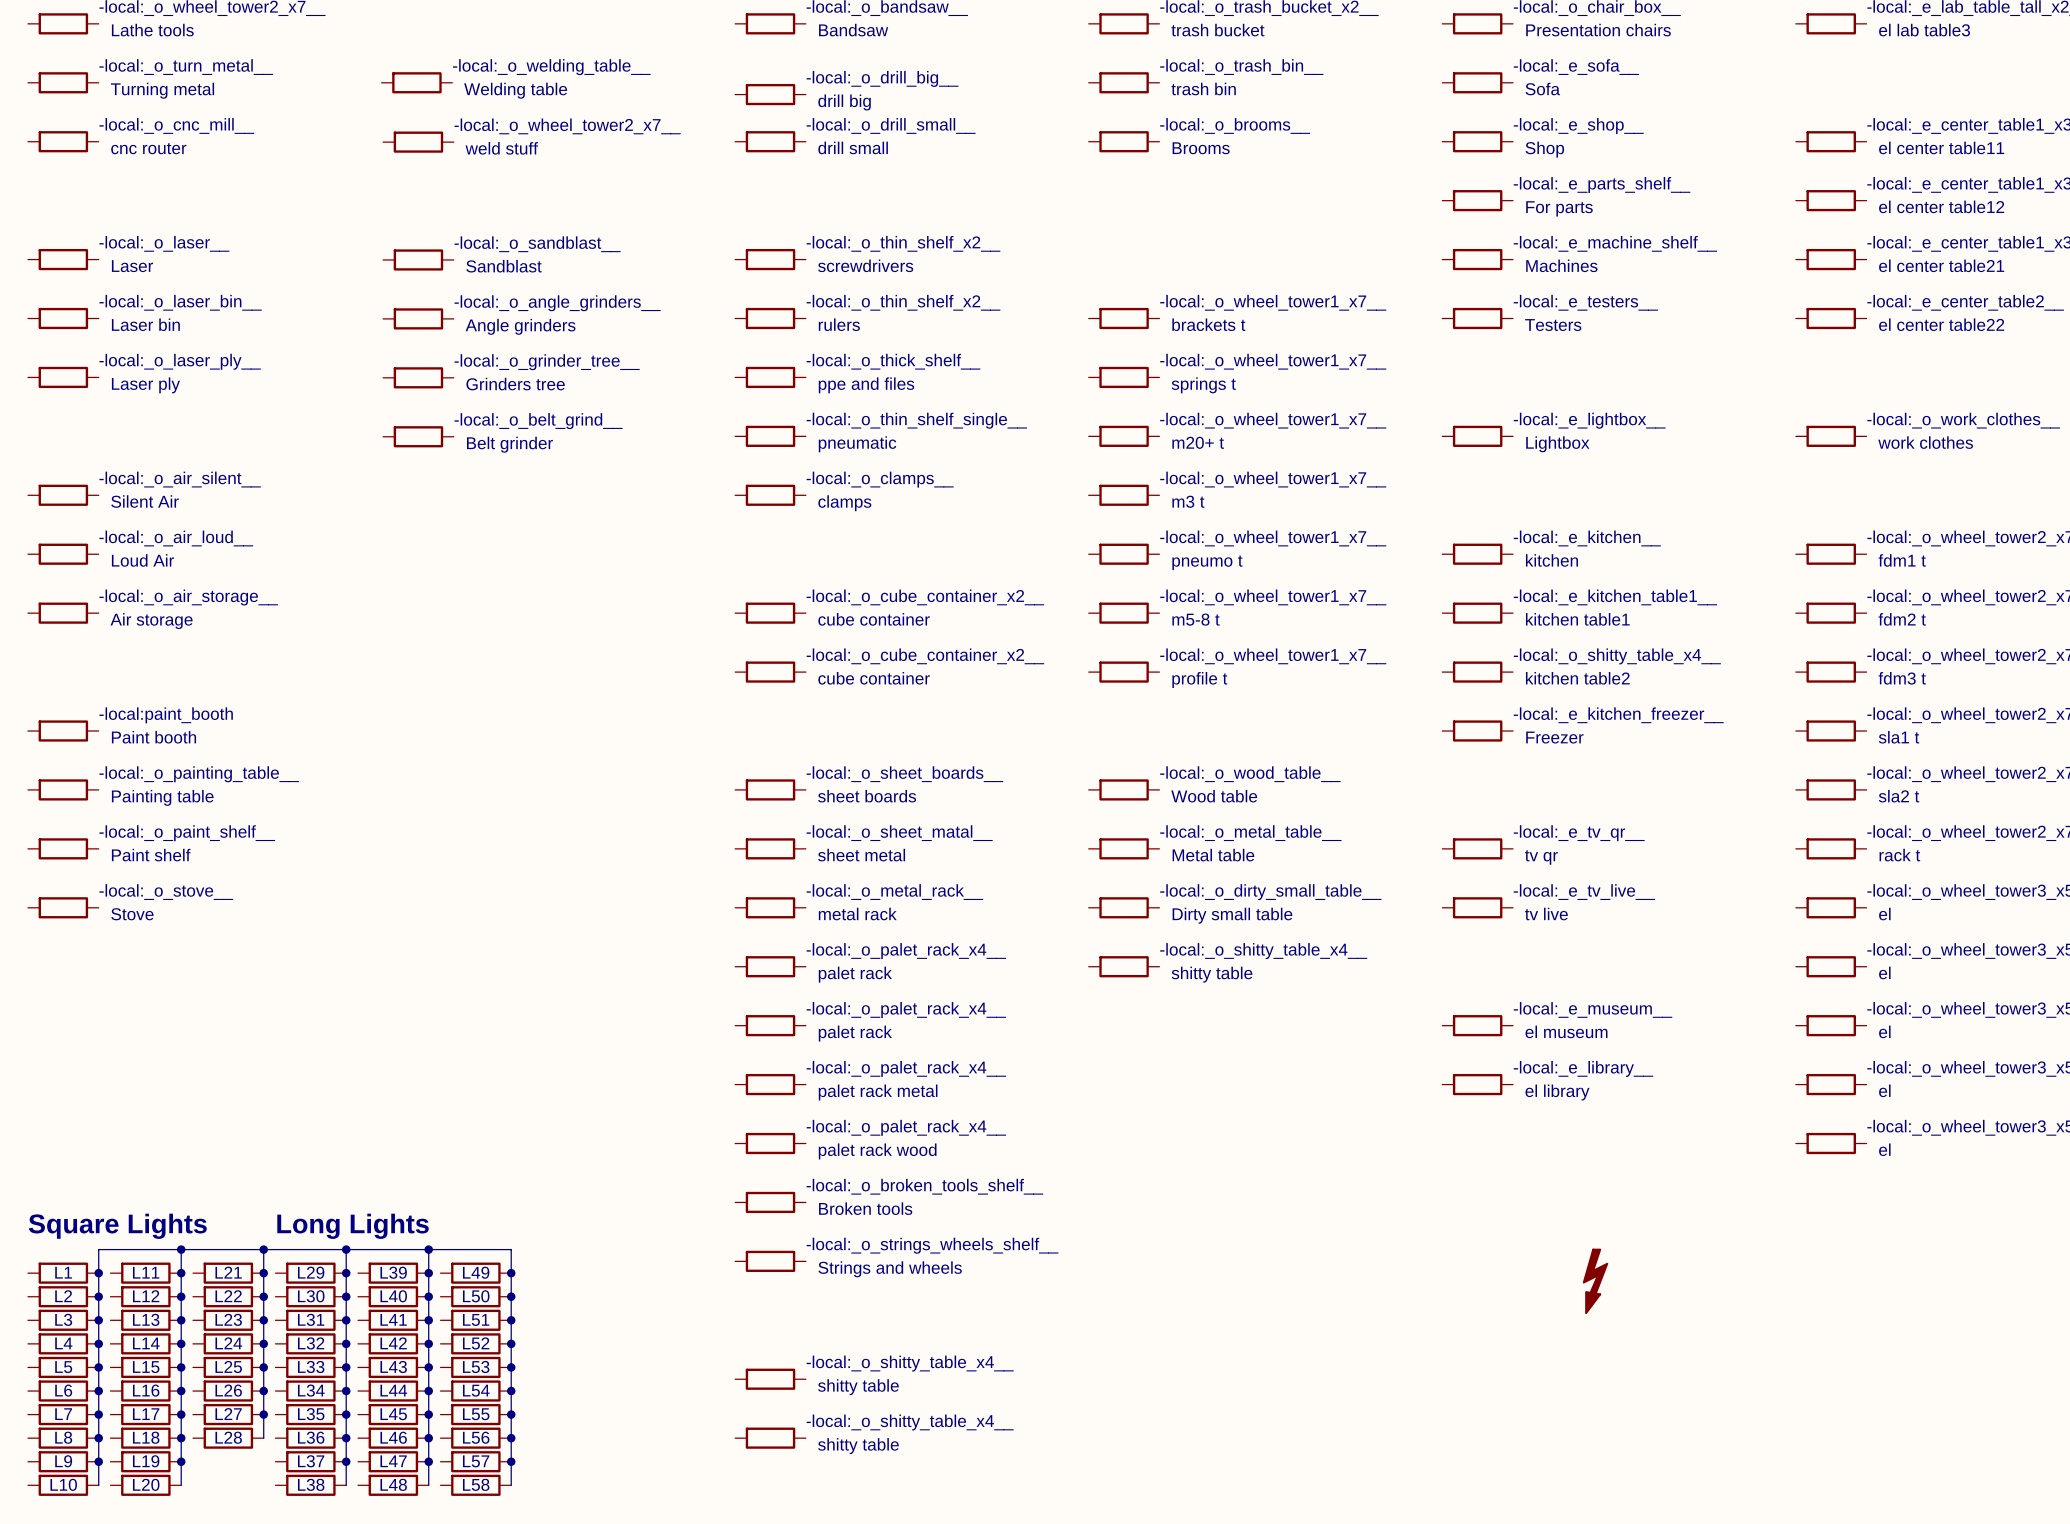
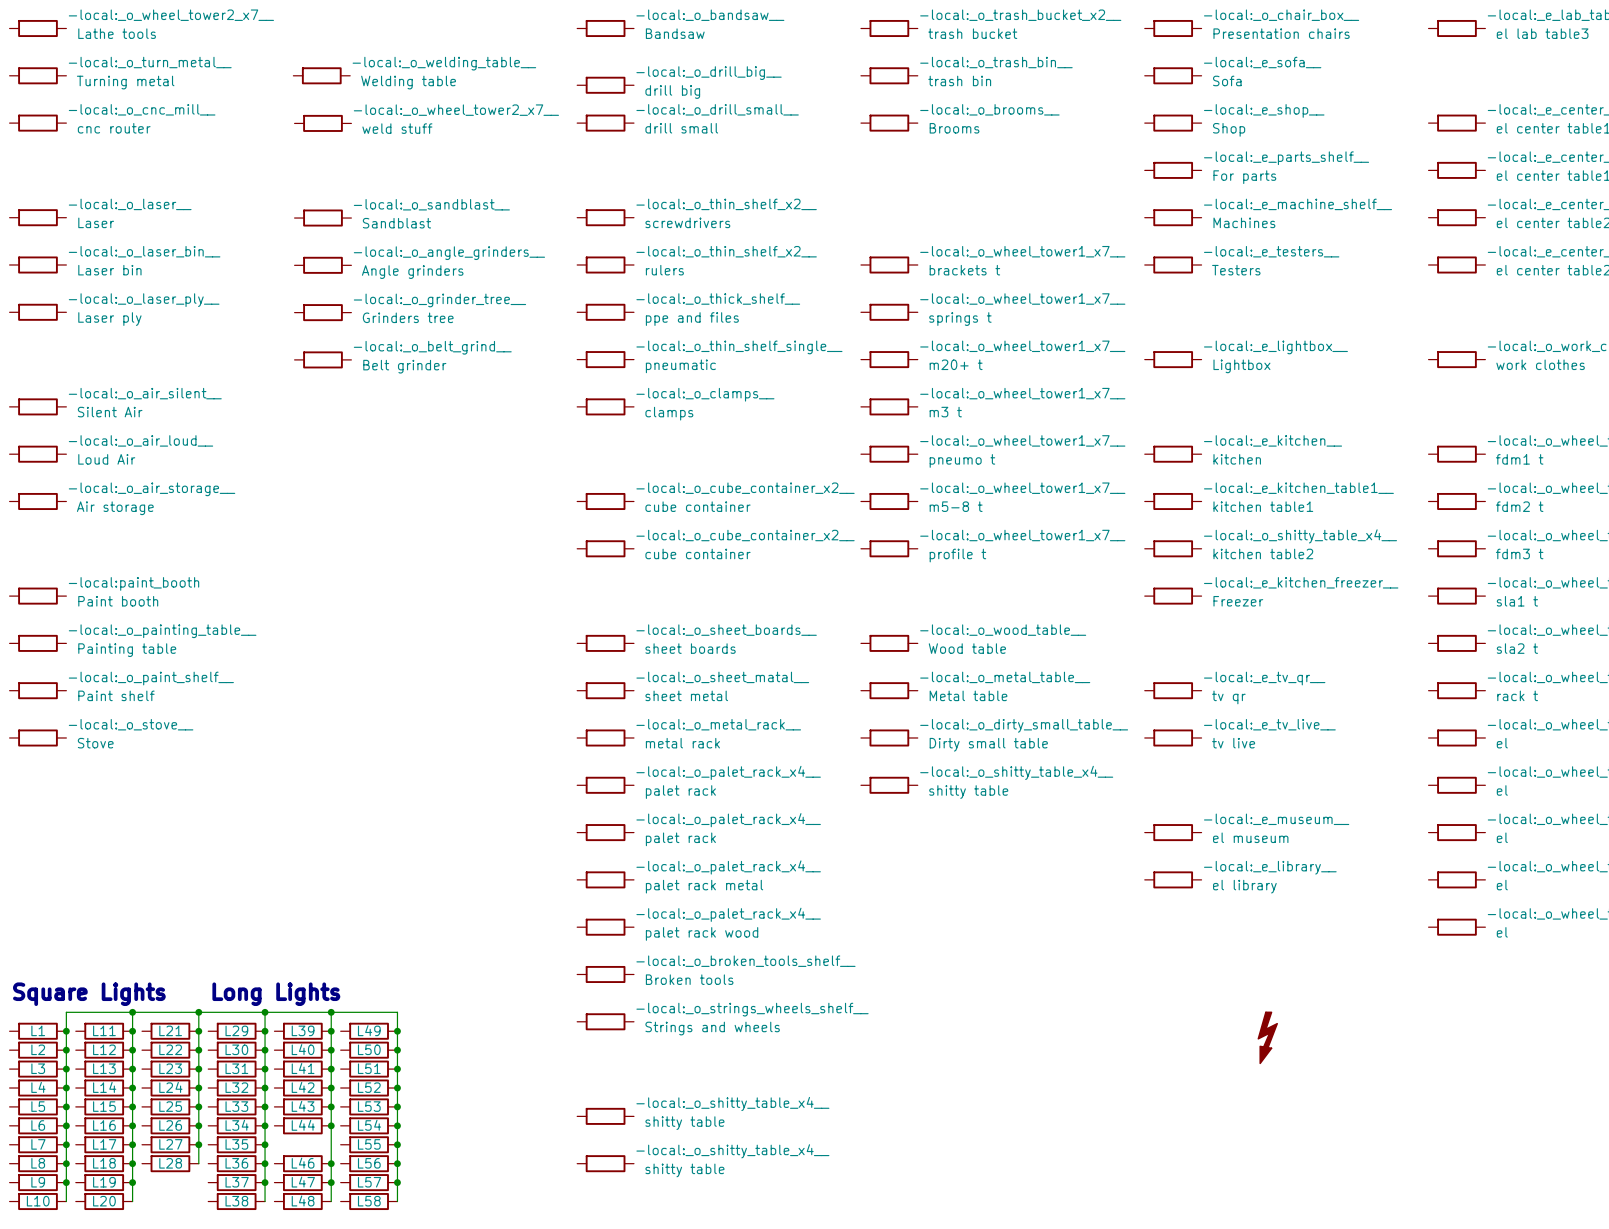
L45: (393, 1414) -> none
junction: (428, 1414) -> none

